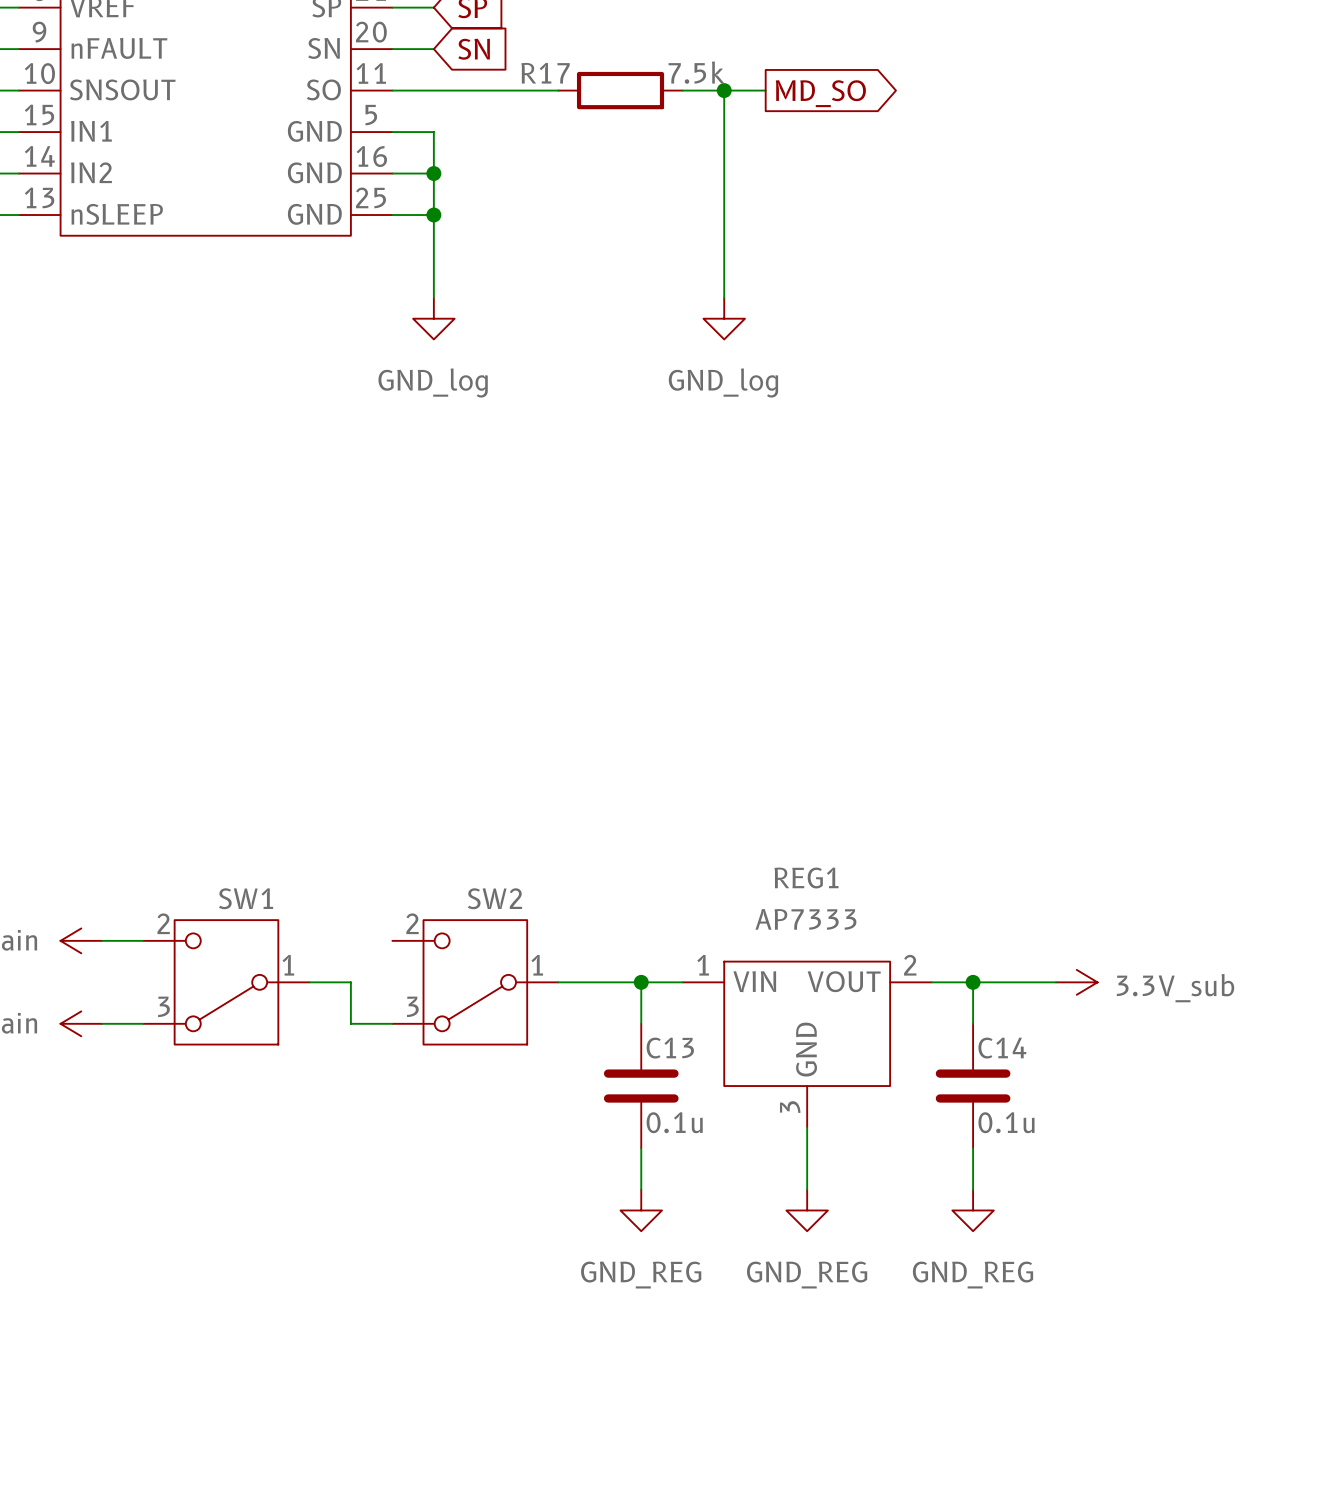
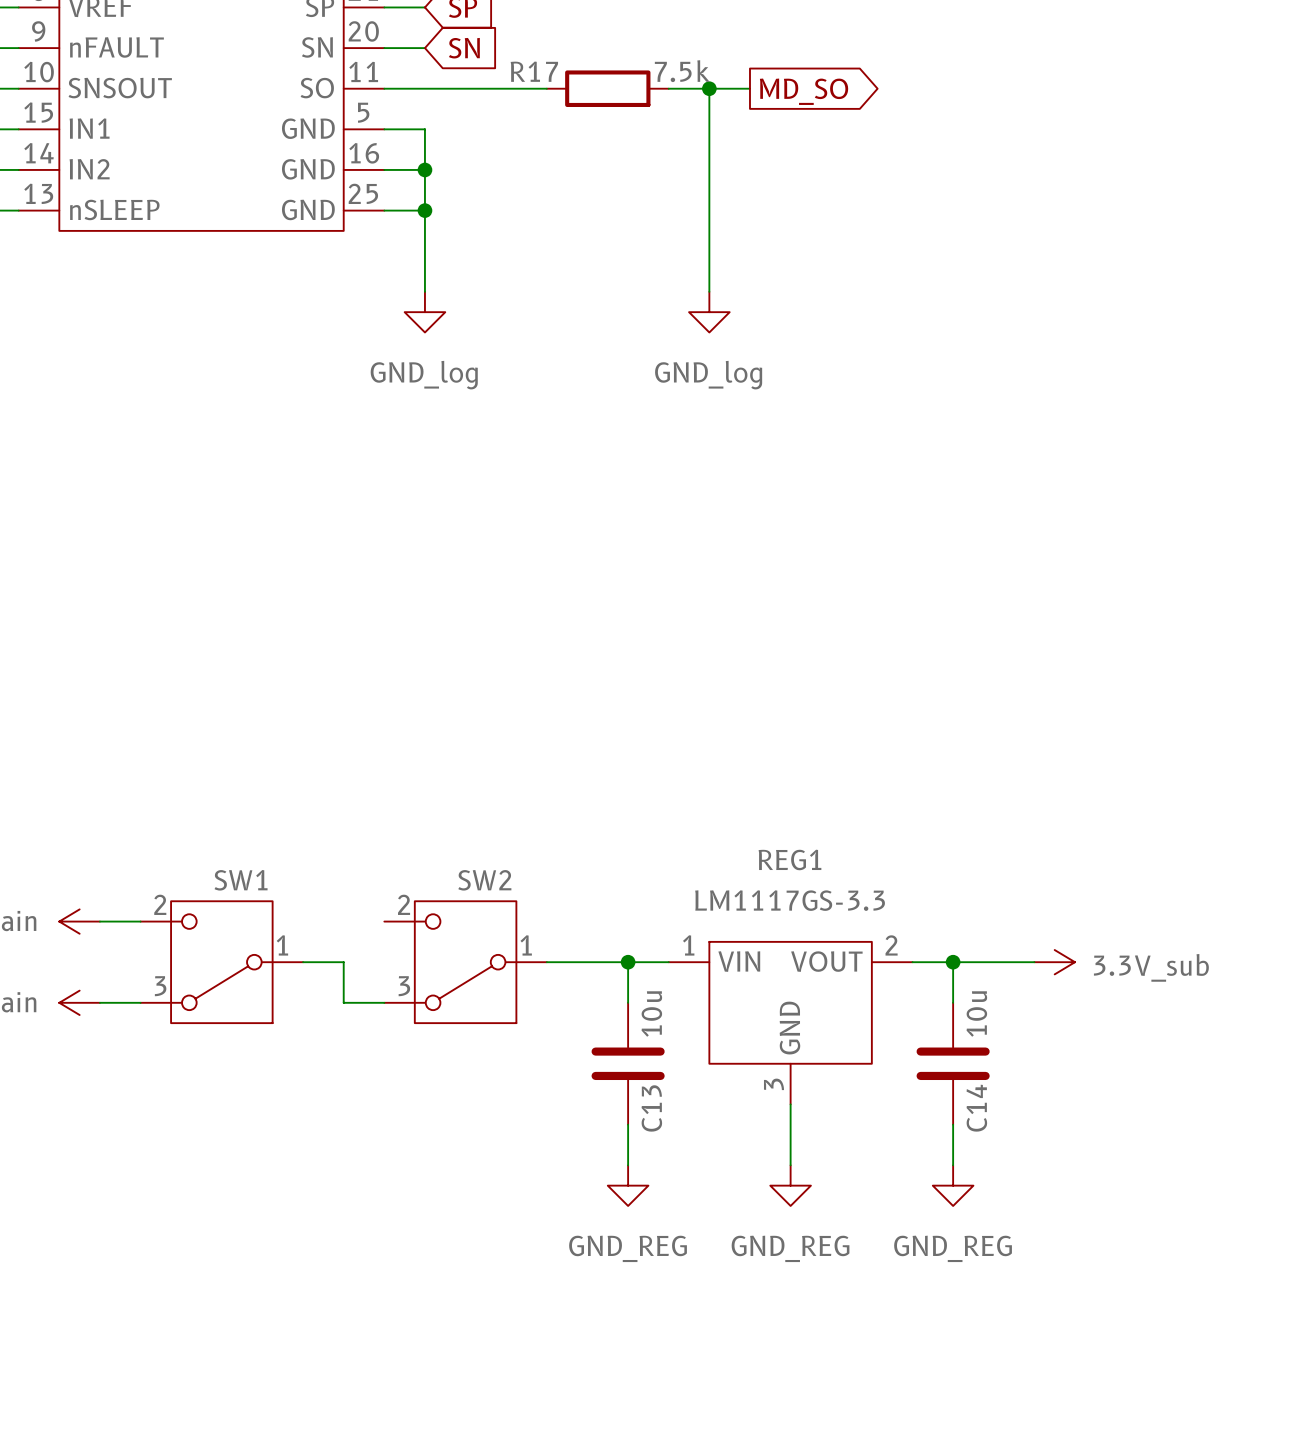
REG1 value: AP7333 (805, 919) -> LM1117GS-3.3 (790, 900)
C13 name rotation: 0° (670, 1048) -> 90° counterclockwise (651, 1108)
C13 name position: C13 (670, 1048) -> C13 (651, 1108)
C14 name rotation: 0° (1002, 1048) -> 90° counterclockwise (976, 1108)
C14 name position: C14 (1002, 1048) -> C14 (976, 1108)
C13 value: 0.1u (674, 1122) -> 10u (651, 1014)
C14 value: 0.1u (1006, 1122) -> 10u (976, 1014)

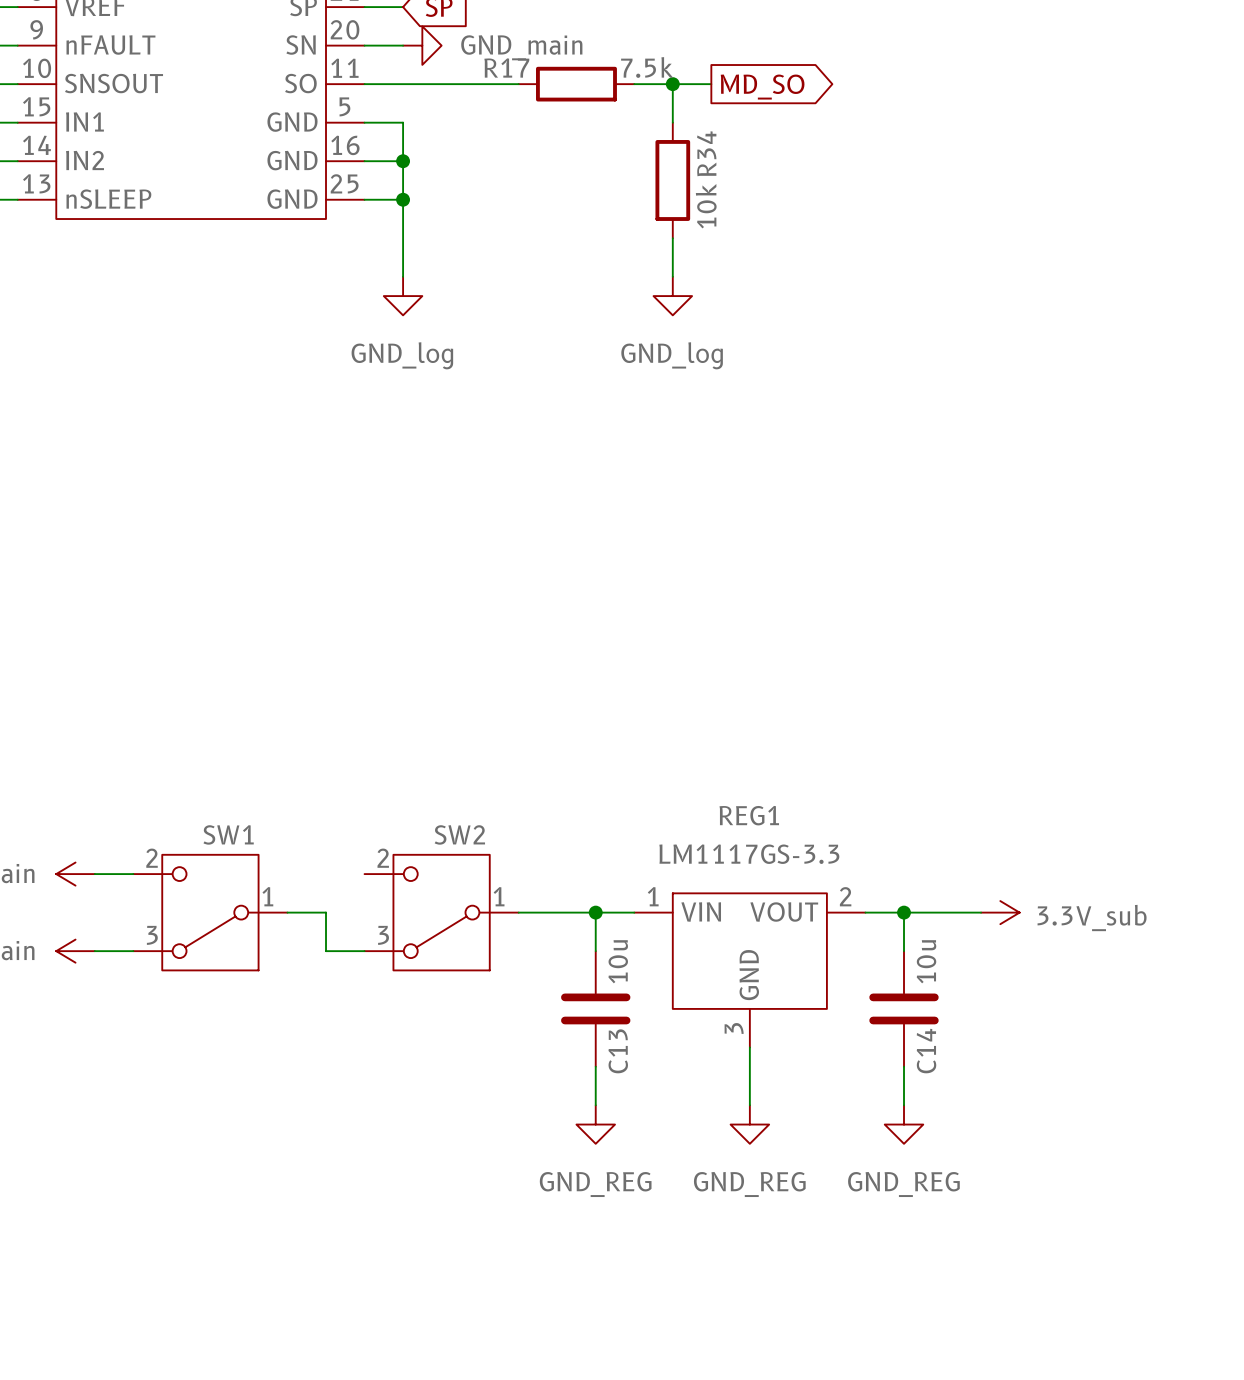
power symbol: none -> GND_main (422, 45)
global label: SN (464, 48) -> none
wire: (709, 129) (709, 251) -> none
R34: none -> 10k (672, 180)

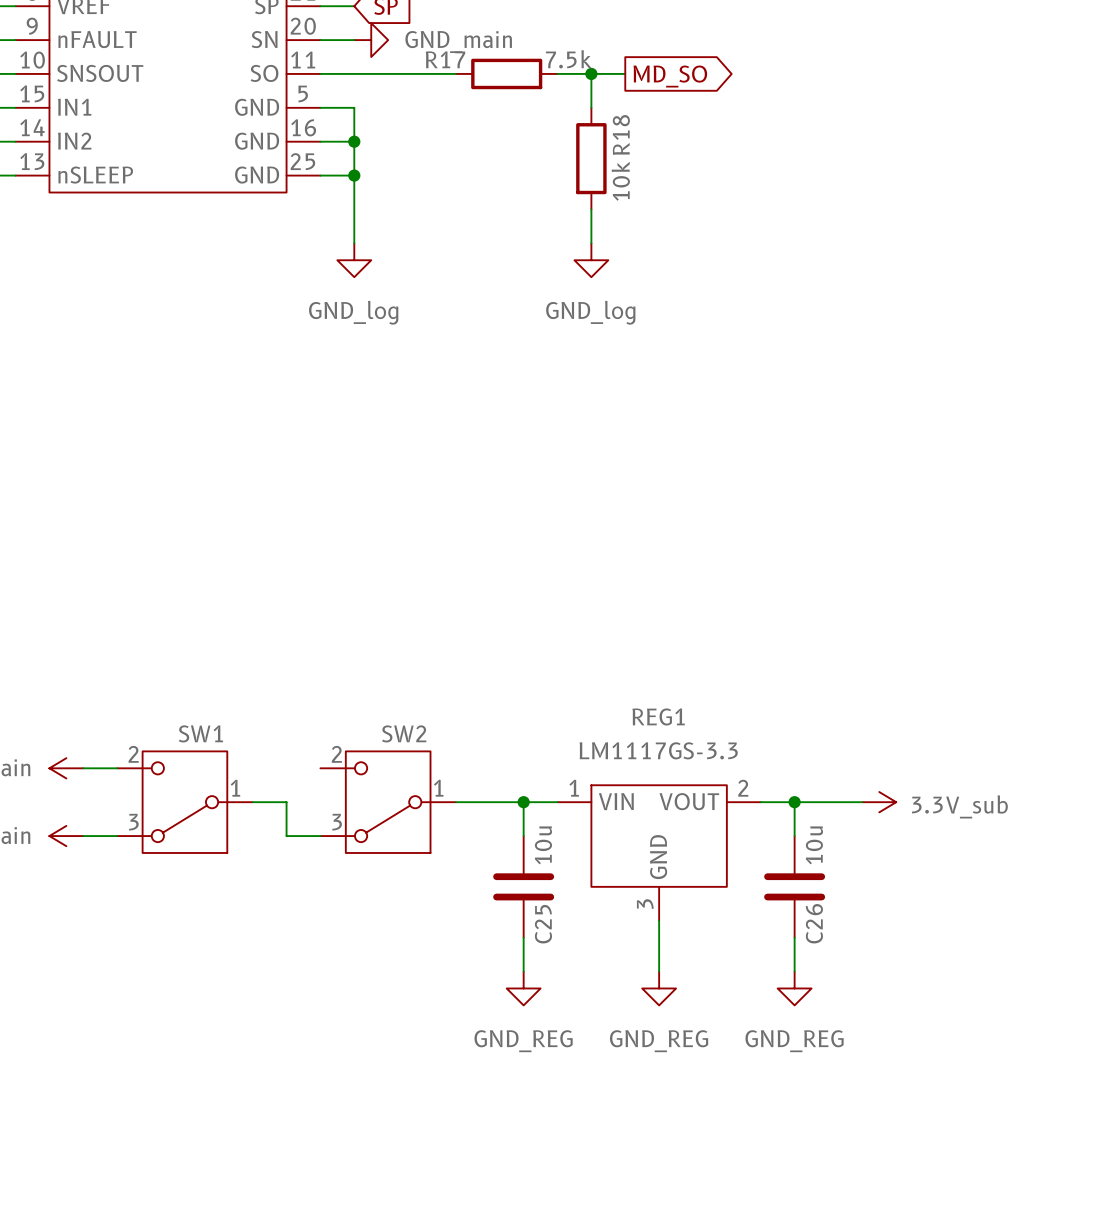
R34 name: R34 (706, 153) -> R18 (621, 135)
C13 name: C13 (618, 1051) -> C25 (543, 924)
C14 name: C14 (926, 1051) -> C26 (814, 923)

